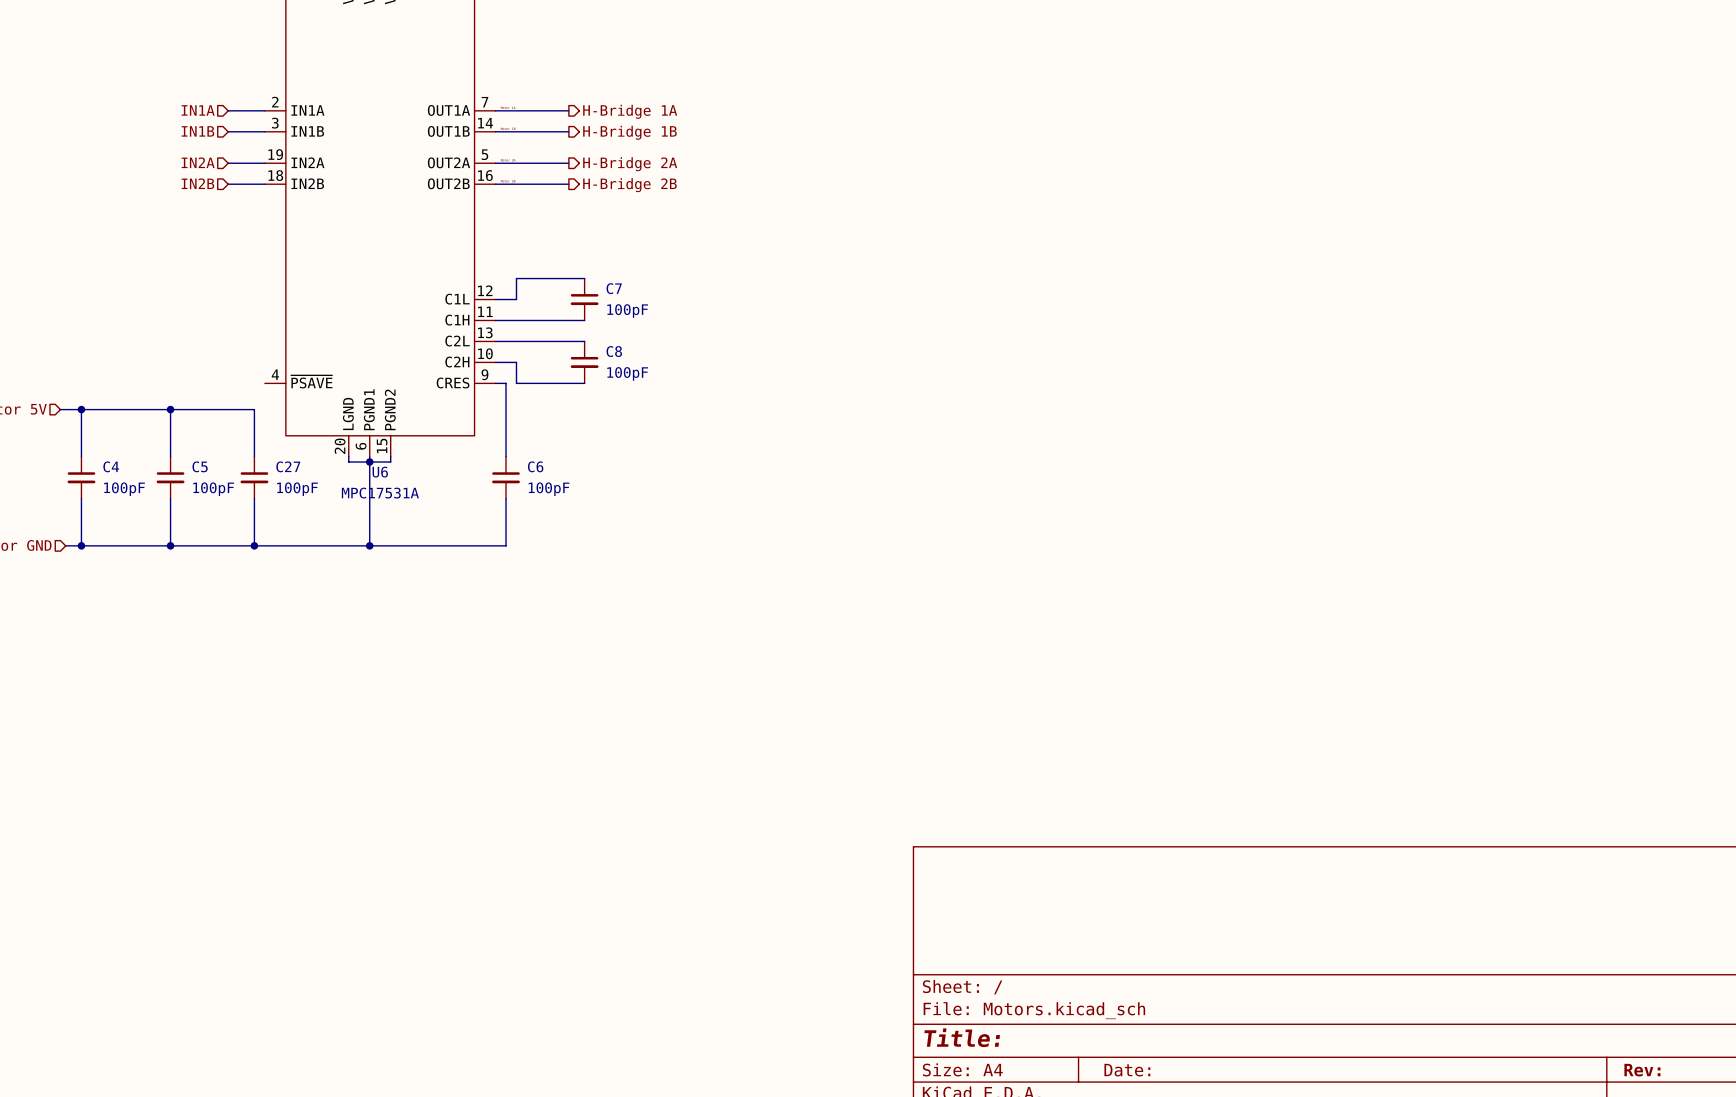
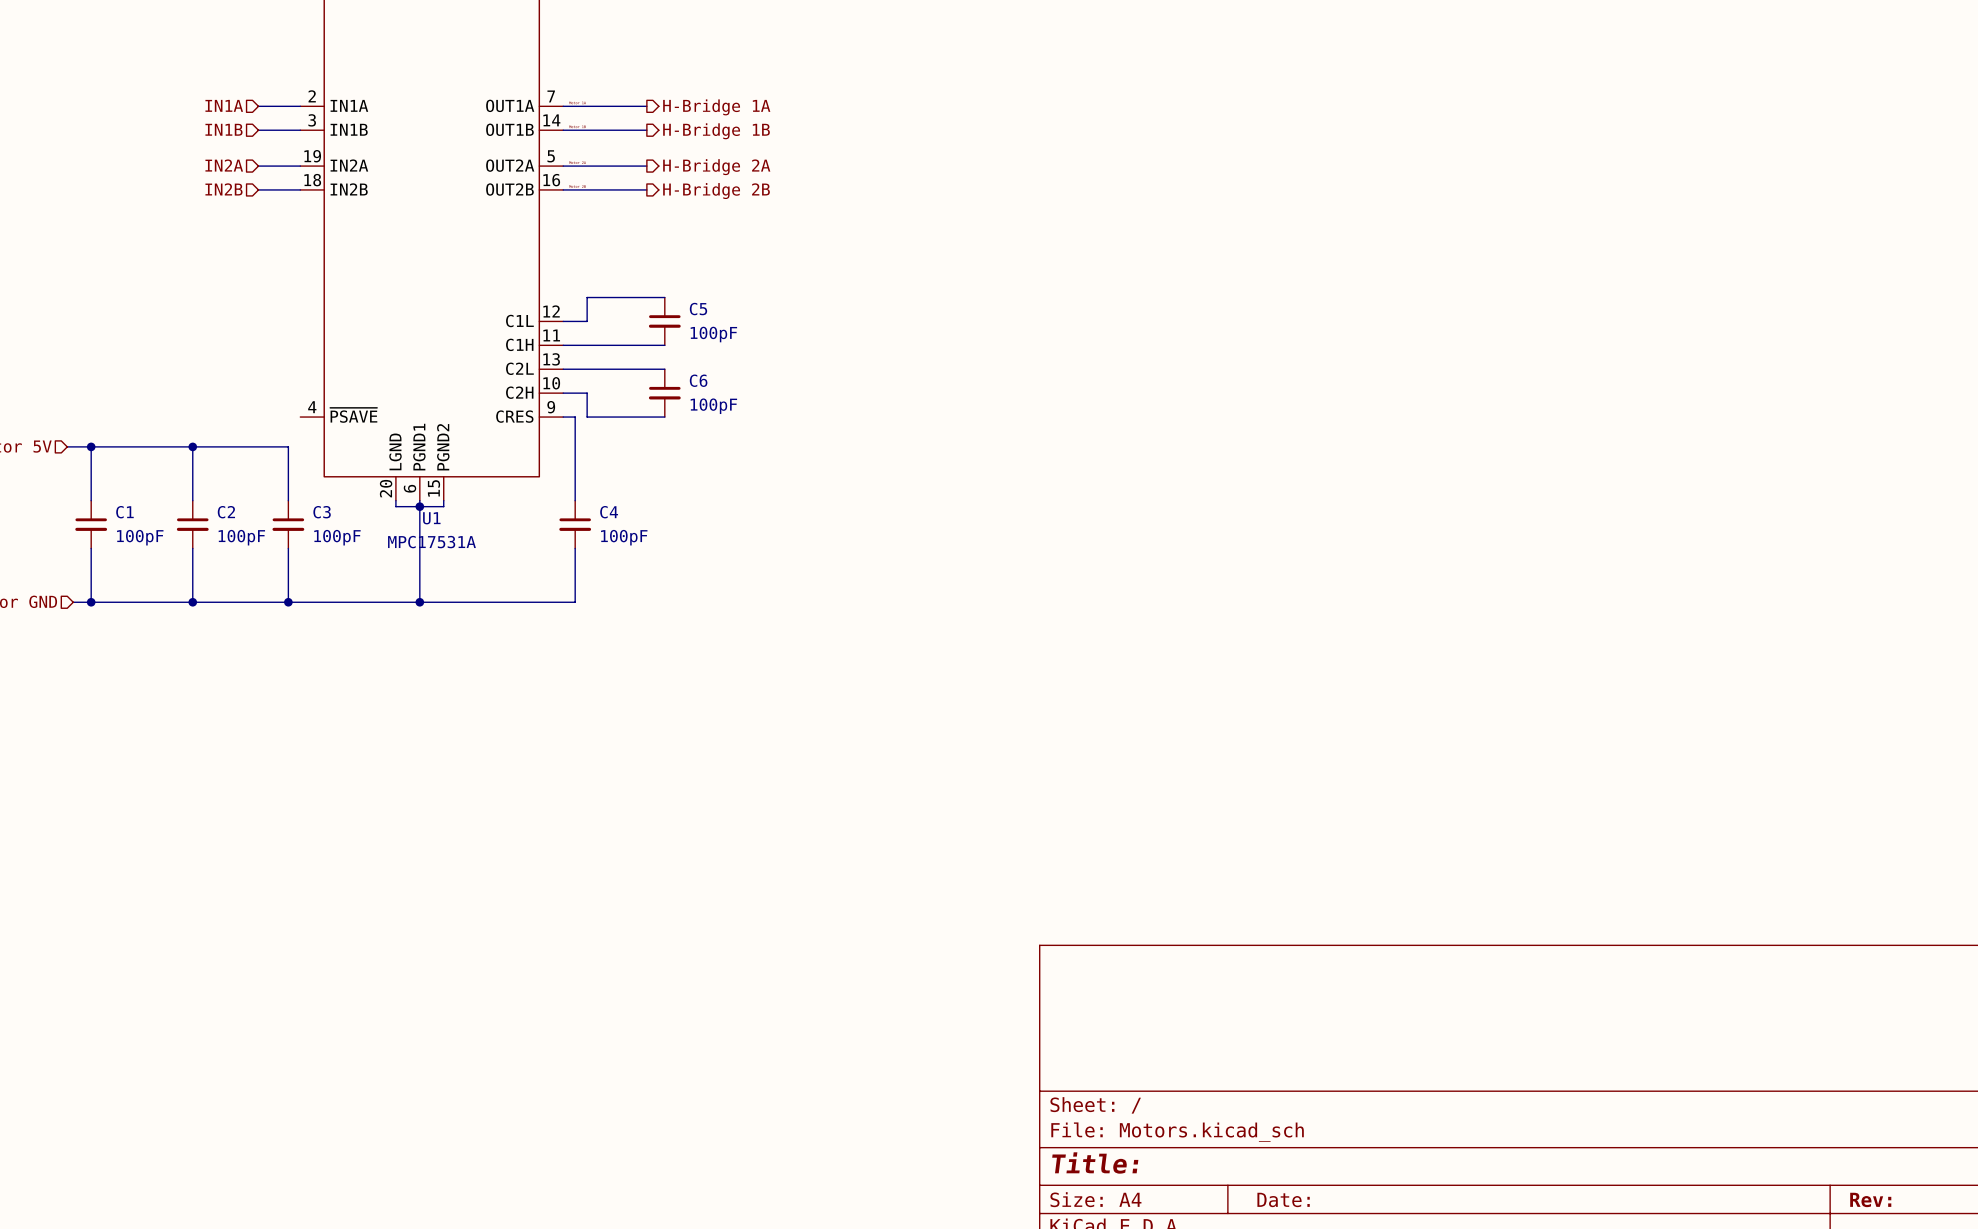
C7 name: C7 (614, 288) -> C5 (698, 309)
C8 name: C8 (614, 351) -> C6 (698, 380)
C4 name: C4 (111, 466) -> C1 (124, 512)
C5 name: C5 (200, 466) -> C2 (226, 512)
C27 name: C27 (288, 466) -> C3 (322, 512)
C6 name: C6 (535, 466) -> C4 (609, 512)
U6 name: U6 (380, 472) -> U1 (431, 518)

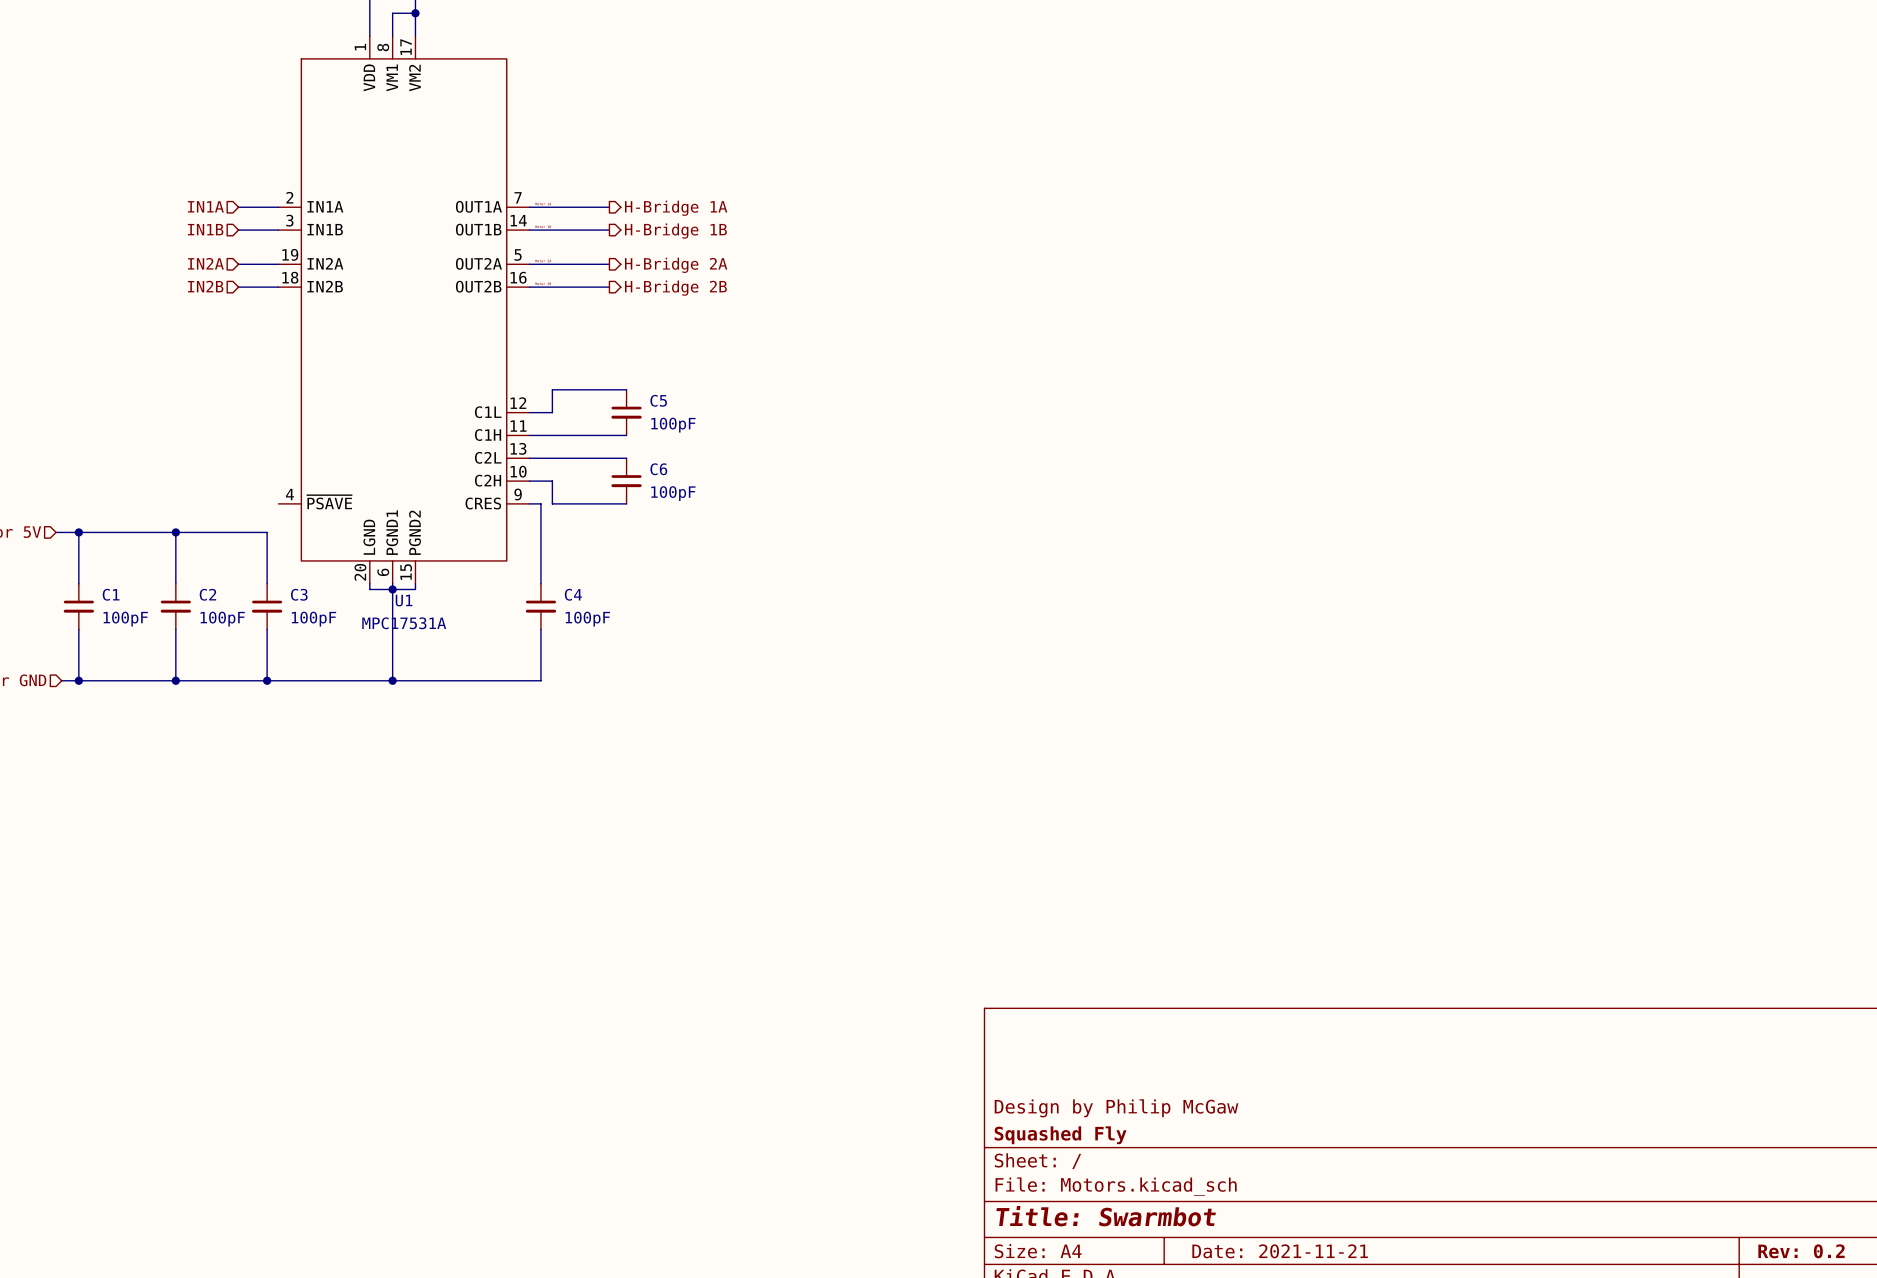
title block: none -> Design by Philip McGaw (1116, 1108)
title block: none -> Squashed Fly (1060, 1135)
title block: Title: (1095, 1162) -> Title: Swarmbot (1106, 1216)
title block: Date: (1283, 1199) -> Date: 2021-11-21 (1280, 1251)
title block: Rev: (1870, 1199) -> Rev: 0.2 (1801, 1251)

